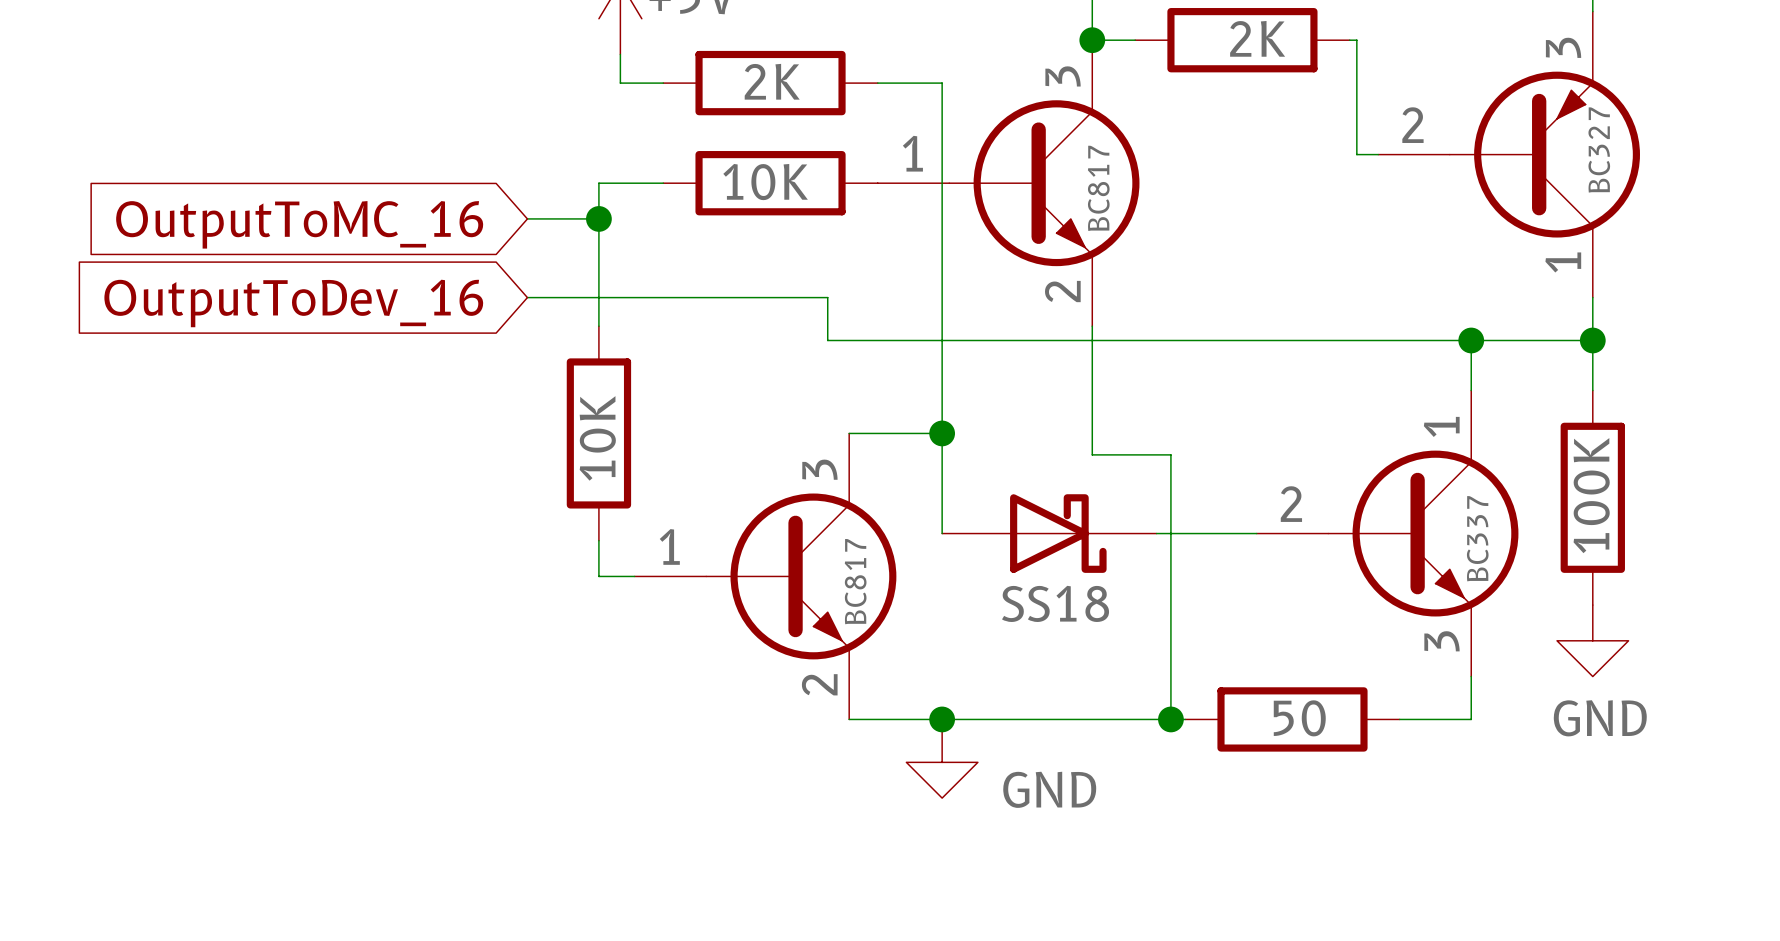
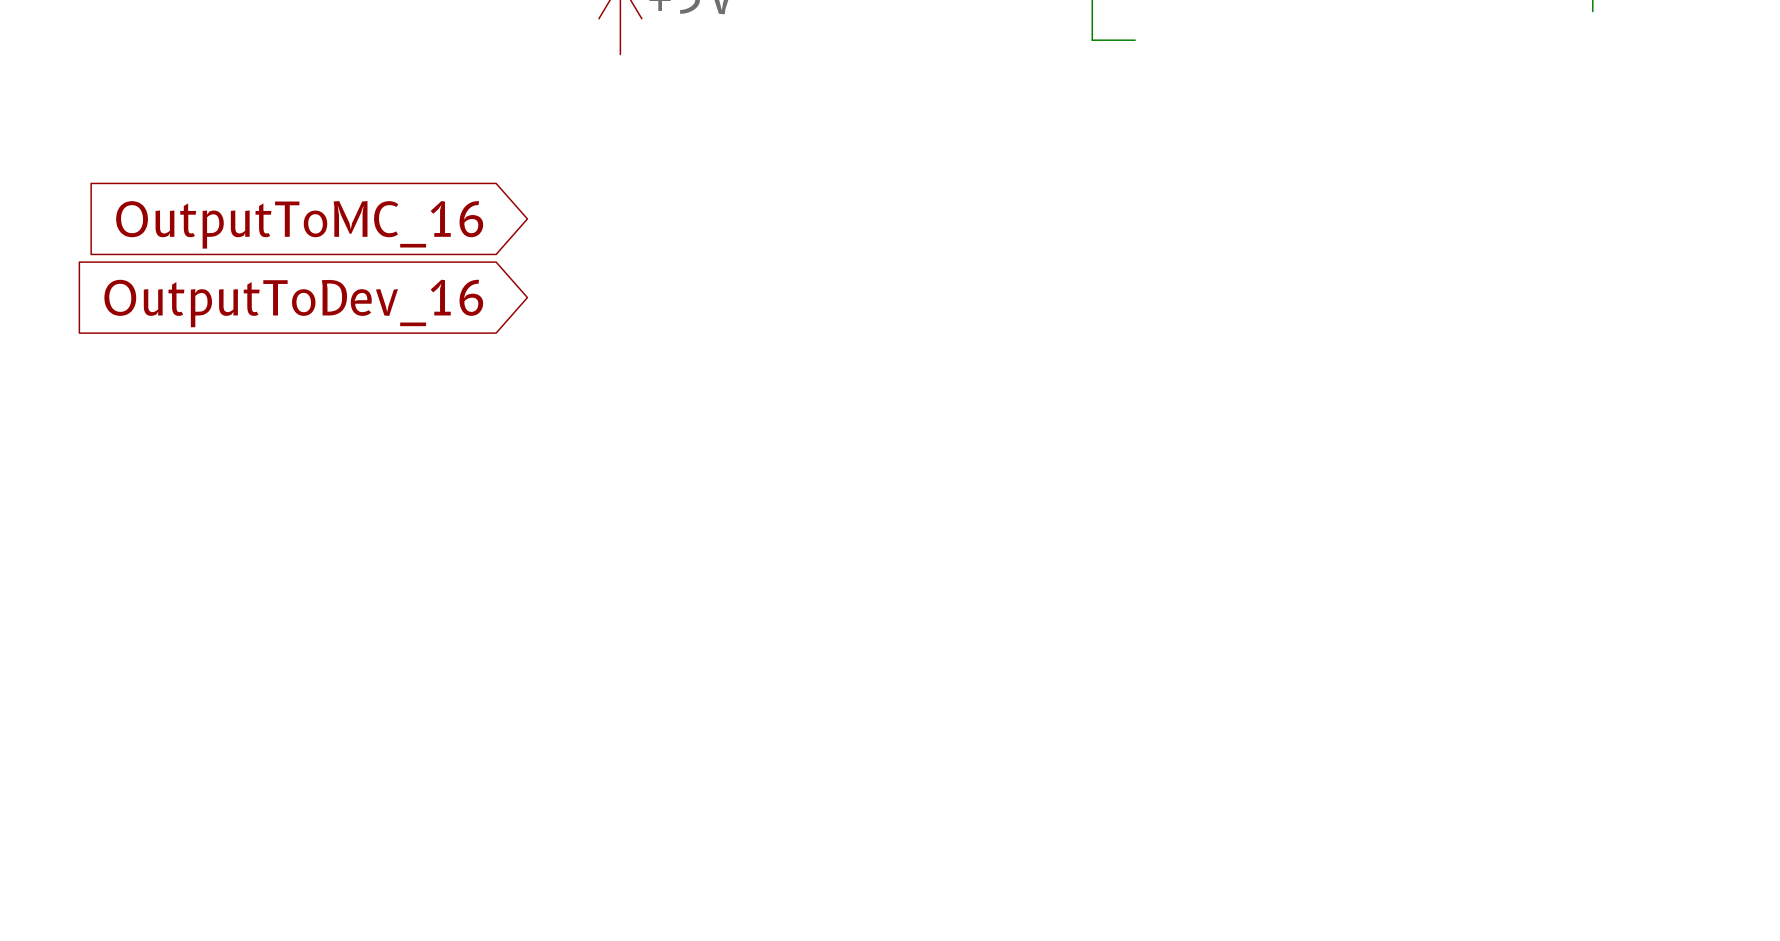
junction: (1092, 40) -> none
part: 2K (1242, 40) -> none
wire: (1349, 40) (1356, 40) (1356, 154) (1378, 154) -> none
wire: (620, 54) (620, 83) (663, 83) -> none
part: 2K (770, 83) -> none
wire: (877, 83) (942, 83) (942, 533) -> none
part: BC327 (1509, 154) -> none
wire: (663, 183) (598, 183) (598, 326) -> none
part: 10K (770, 183) -> none
part: BC817 (1008, 183) -> none
wire: (527, 218) (598, 218) -> none
junction: (598, 218) -> none
wire: (527, 297) (827, 297) (827, 340) (1592, 340) -> none
wire: (1592, 297) (1592, 390) -> none
wire: (1092, 326) (1092, 454) (1170, 454) (1170, 719) -> none
wire: (1471, 340) (1471, 390) -> none
junction: (1471, 340) -> none
junction: (1592, 340) -> none
part: 10K (598, 433) -> none
wire: (849, 433) (942, 433) -> none
junction: (942, 433) -> none
part: 100K (1592, 497) -> none
part: SS18 (1049, 533) -> none
wire: (1156, 533) (1256, 533) -> none
part: BC337 (1387, 533) -> none
wire: (598, 540) (598, 576) (634, 576) -> none
part: BC817 (765, 576) -> none
power symbol: GND (1592, 640) -> none
wire: (1471, 676) (1471, 719) (1399, 719) -> none
wire: (849, 719) (1185, 719) -> none
junction: (942, 719) -> none
junction: (1170, 719) -> none
part: 50 (1292, 719) -> none
power symbol: GND (942, 762) -> none

